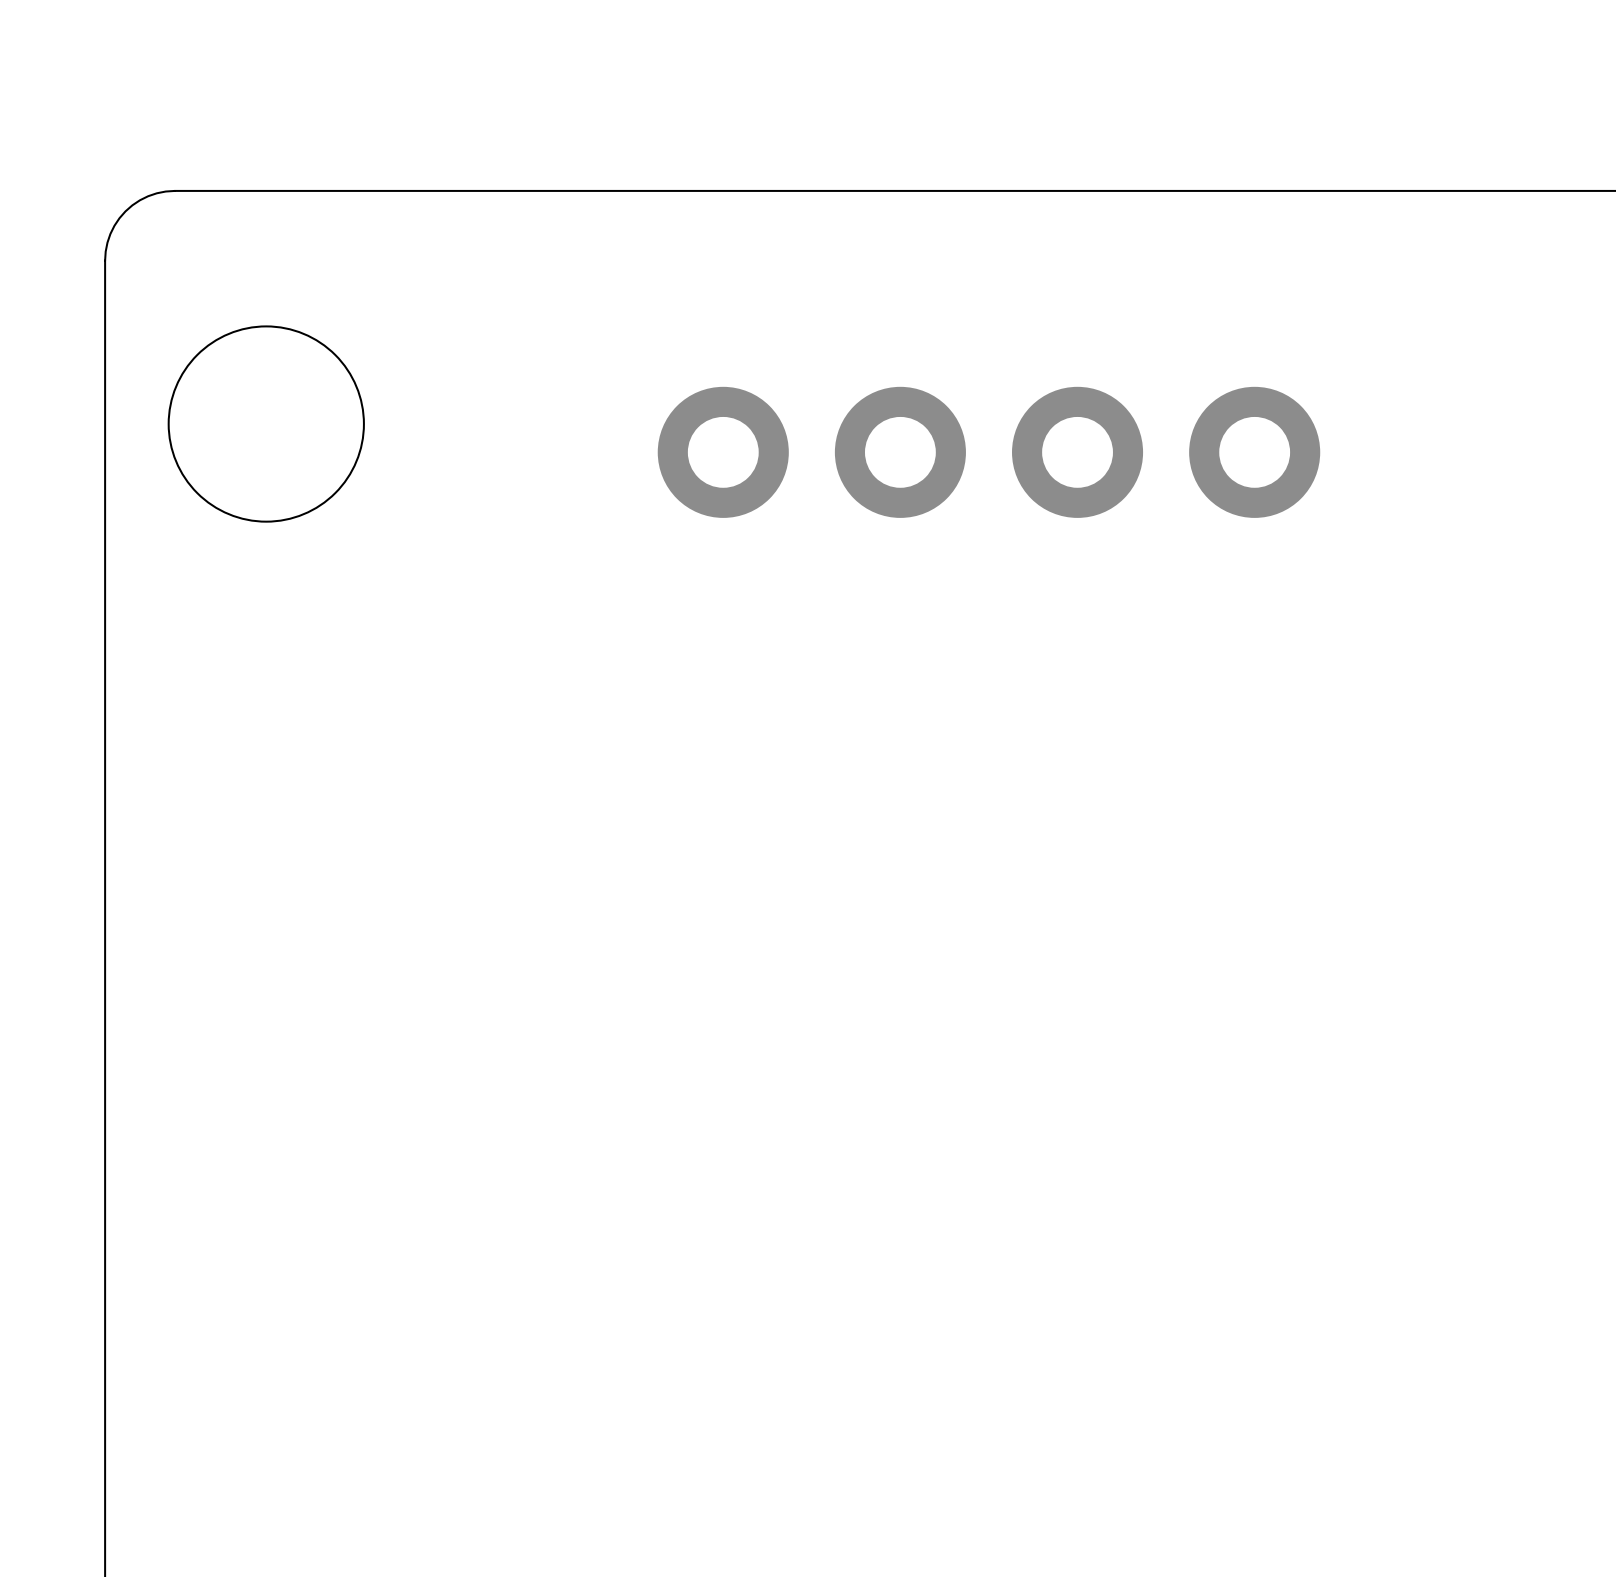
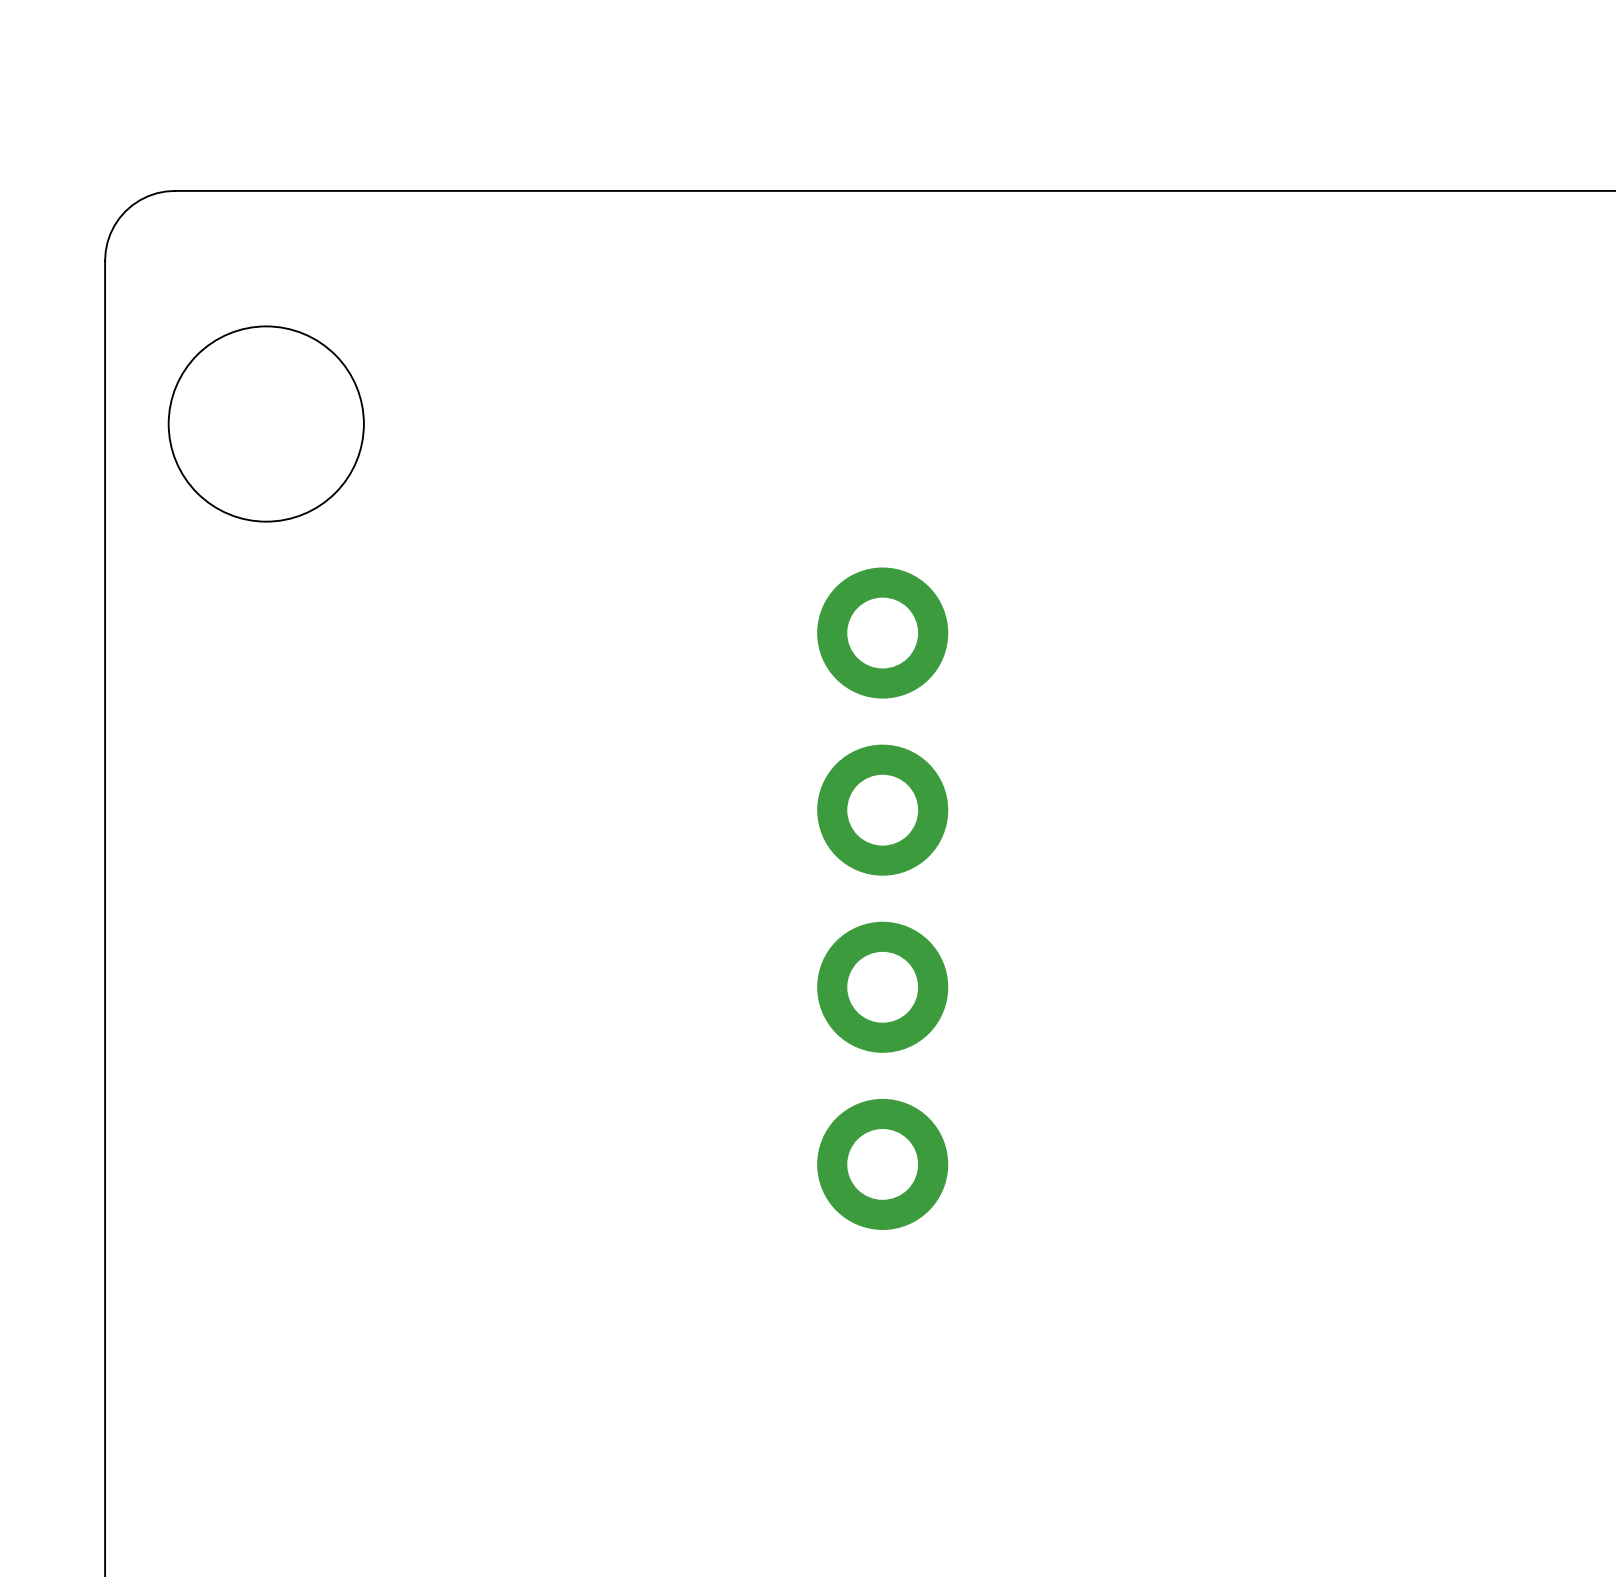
part rotation: 0° (988, 452) -> 90° clockwise (882, 898)
part position: (988, 452) -> (882, 898)

